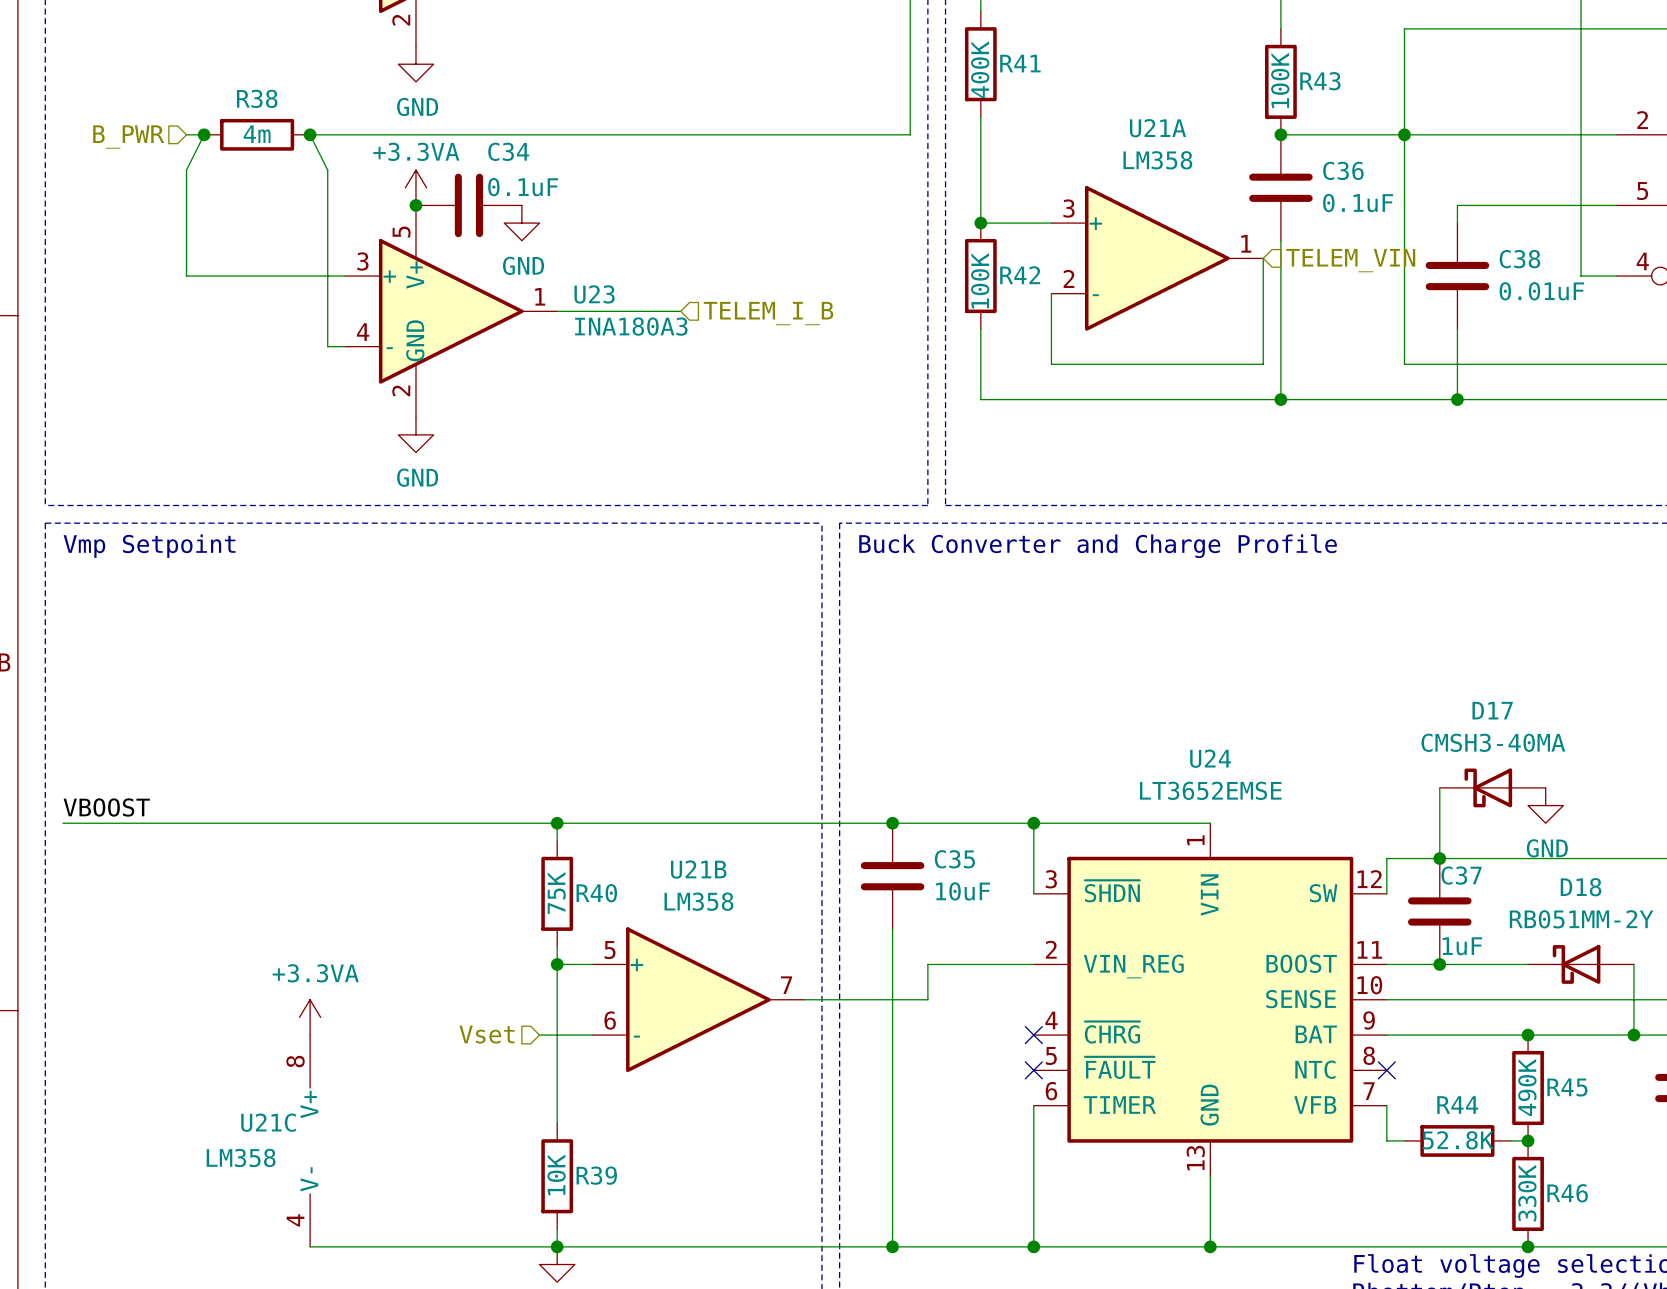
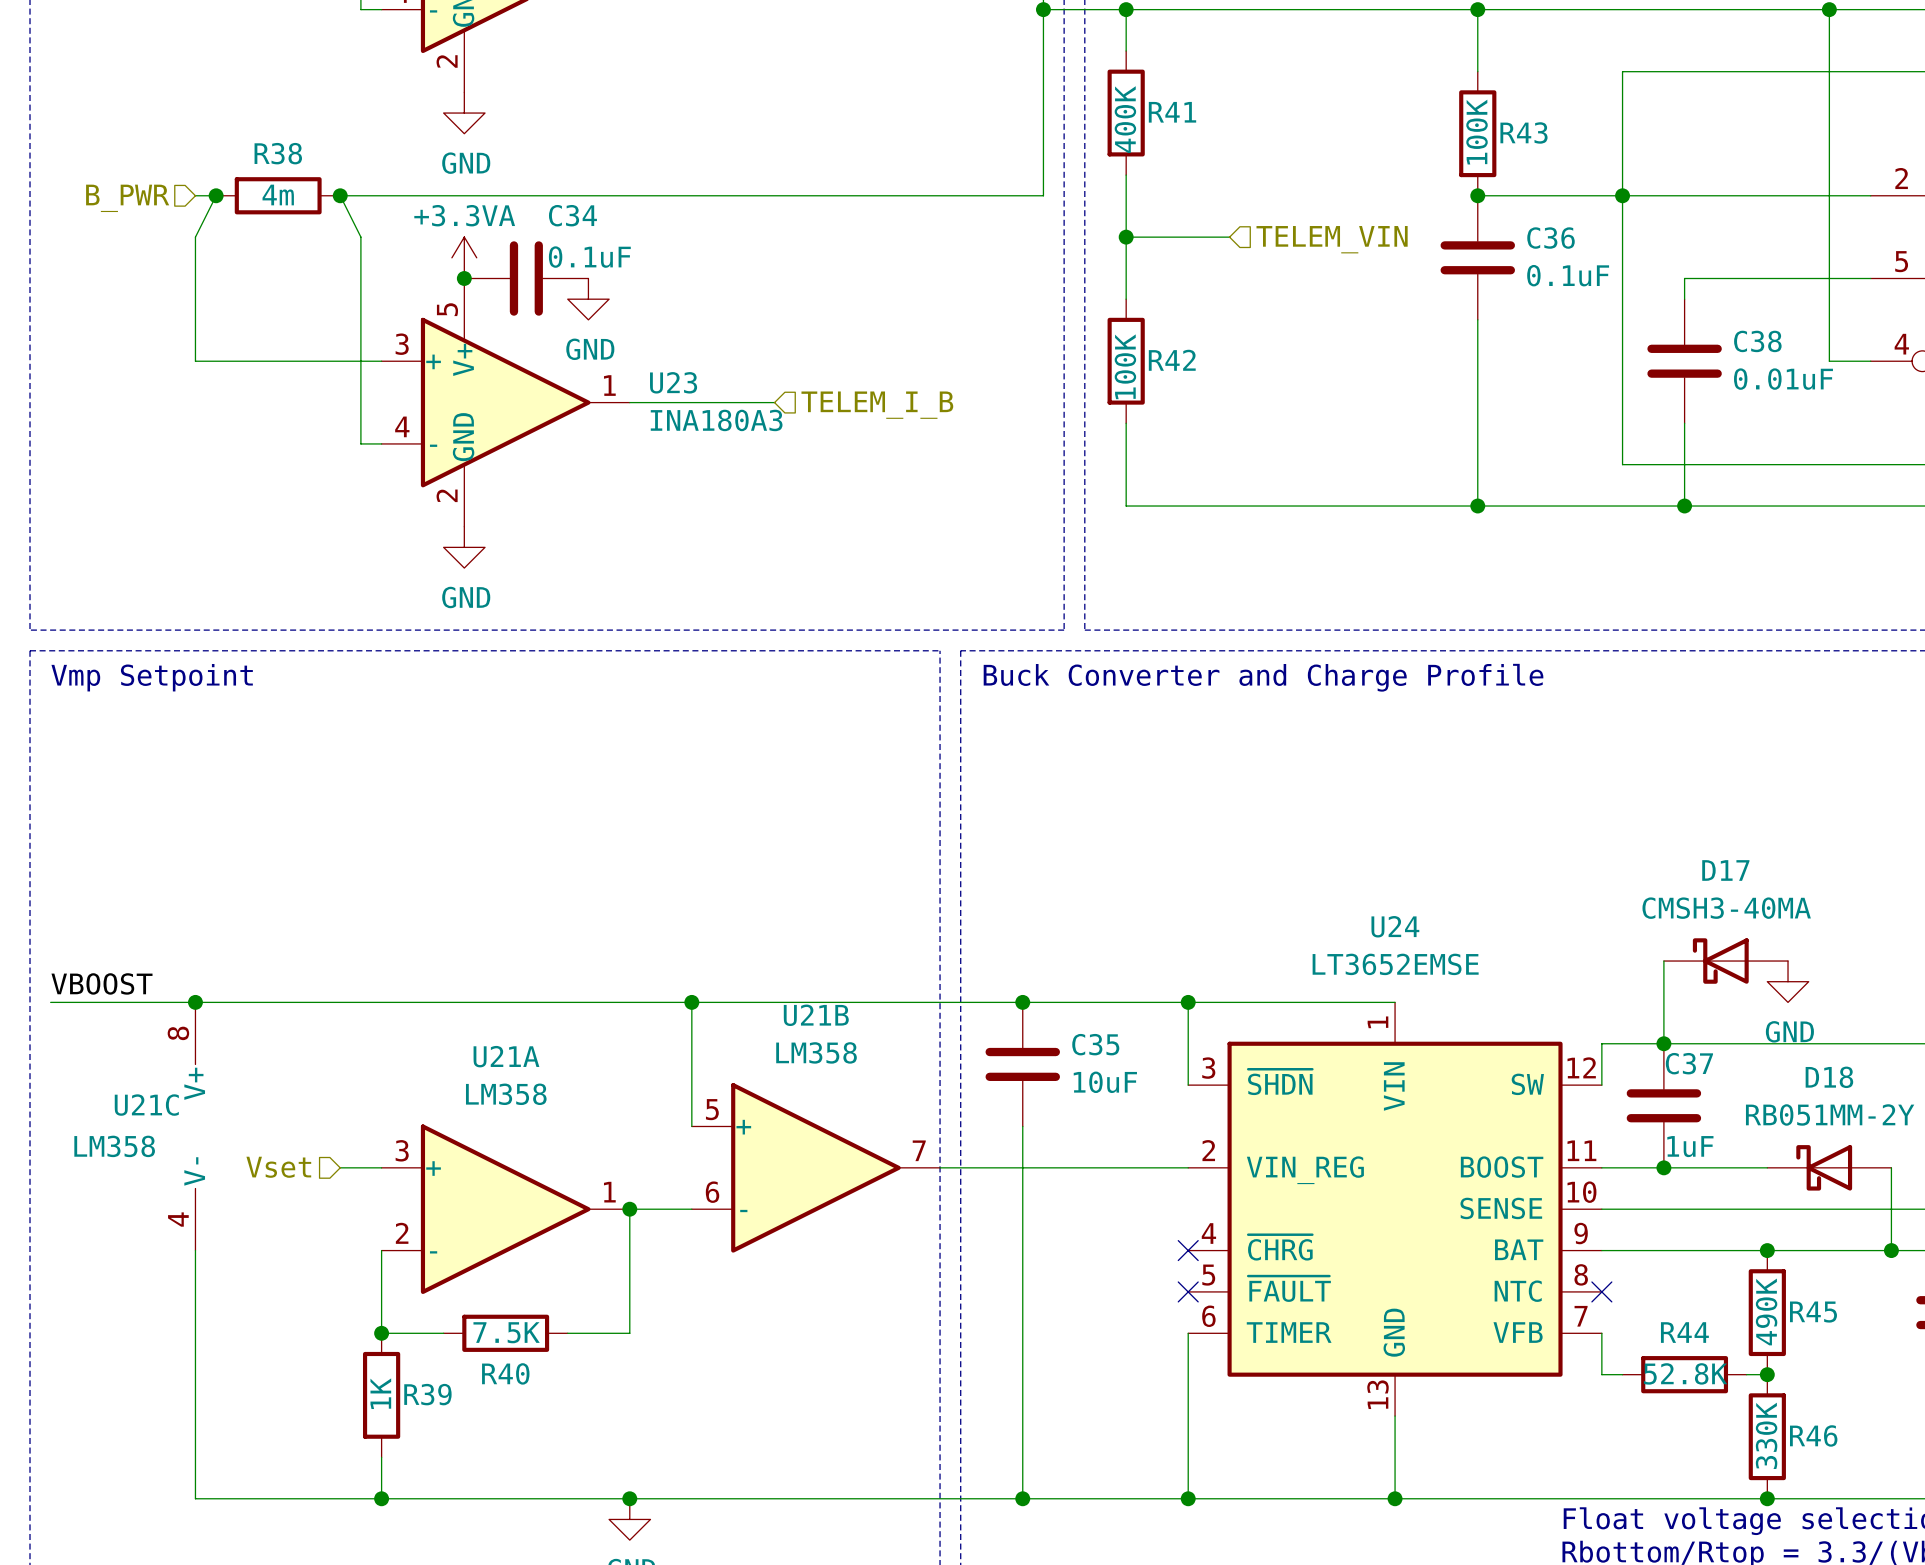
wire: none -> (1126, 237) (1229, 237)
wire: (980, 223) (1051, 223) -> none
junction position: (980, 223) -> (1126, 237)
U21A position: (1157, 258) -> (505, 1209)
wire: (1263, 258) (1263, 364) (1051, 364) (1051, 293) -> none
hierarchical label position: TELEM_VIN (1350, 260) -> TELEM_VIN (1332, 239)
junction: none -> (195, 1002)
wire: (557, 823) (557, 840) -> none
junction position: (557, 823) -> (691, 1002)
wire: none -> (691, 1002) (691, 1126)
R40 value: 75K (556, 893) -> 7.5K (506, 1332)
R40 rotation: 0° (557, 893) -> 90° clockwise (505, 1333)
R40 position: (557, 893) -> (505, 1333)
wire: (557, 946) (557, 999) -> (691, 1209) (629, 1209)
wire: (557, 964) (592, 964) -> (340, 1167) (381, 1167)
junction position: (557, 964) -> (629, 1209)
wire: (927, 964) (927, 999) (804, 999) -> (1064, 1167) (940, 1167)
U21B position: (698, 999) -> (815, 1167)
power symbol: +3.3VA (310, 1017) -> none
hierarchical label position: Vset (487, 1034) -> Vset (278, 1167)
wire: none -> (195, 1250) (195, 1498) (340, 1498)
wire: none -> (381, 1250) (381, 1333) (443, 1333)
wire: (539, 1035) (592, 1035) -> none
junction: none -> (381, 1333)
wire: (557, 1105) (557, 1123) -> (629, 1333) (567, 1333)
U21C position: (310, 1140) -> (195, 1126)
R39 value: 10K (556, 1174) -> 1K (380, 1393)
R39 position: (557, 1176) -> (381, 1395)
wire: none -> (381, 1457) (381, 1498)
wire: (557, 1229) (557, 1246) -> none
junction: none -> (381, 1498)

